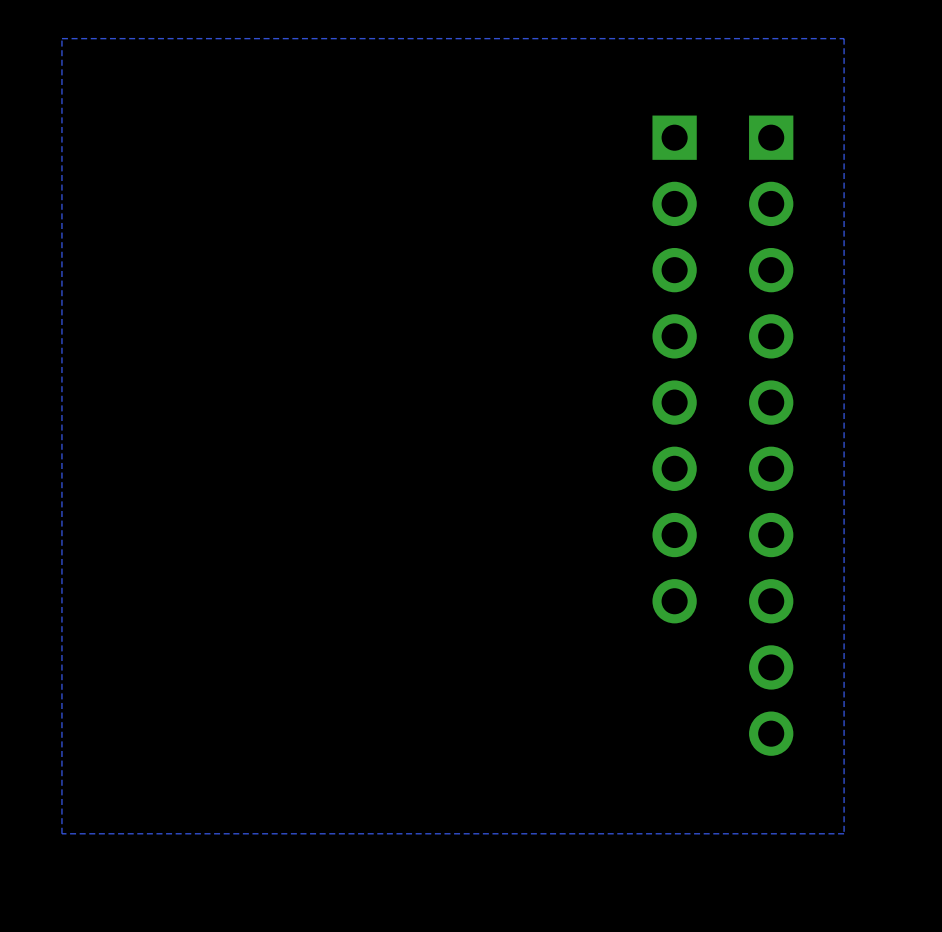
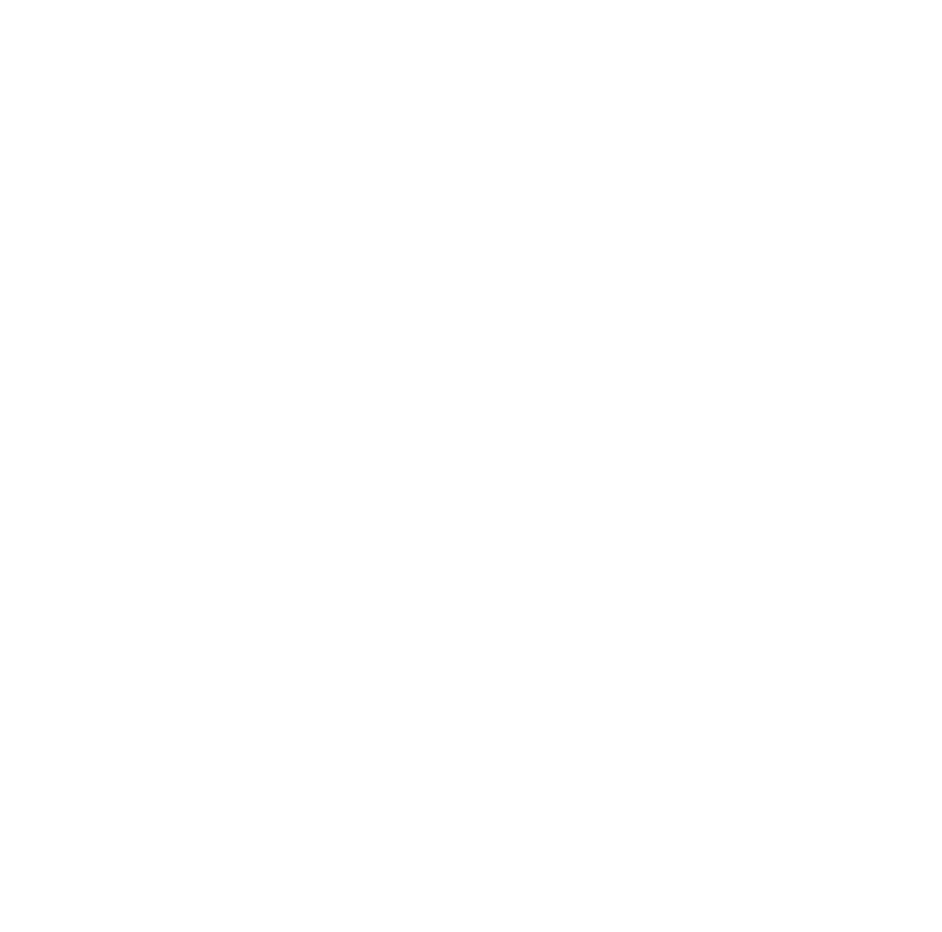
zone outline: (844, 38) (844, 833) (61, 833) (61, 38) (844, 38) -> none
part: (674, 369) -> none
part: (771, 435) -> none

